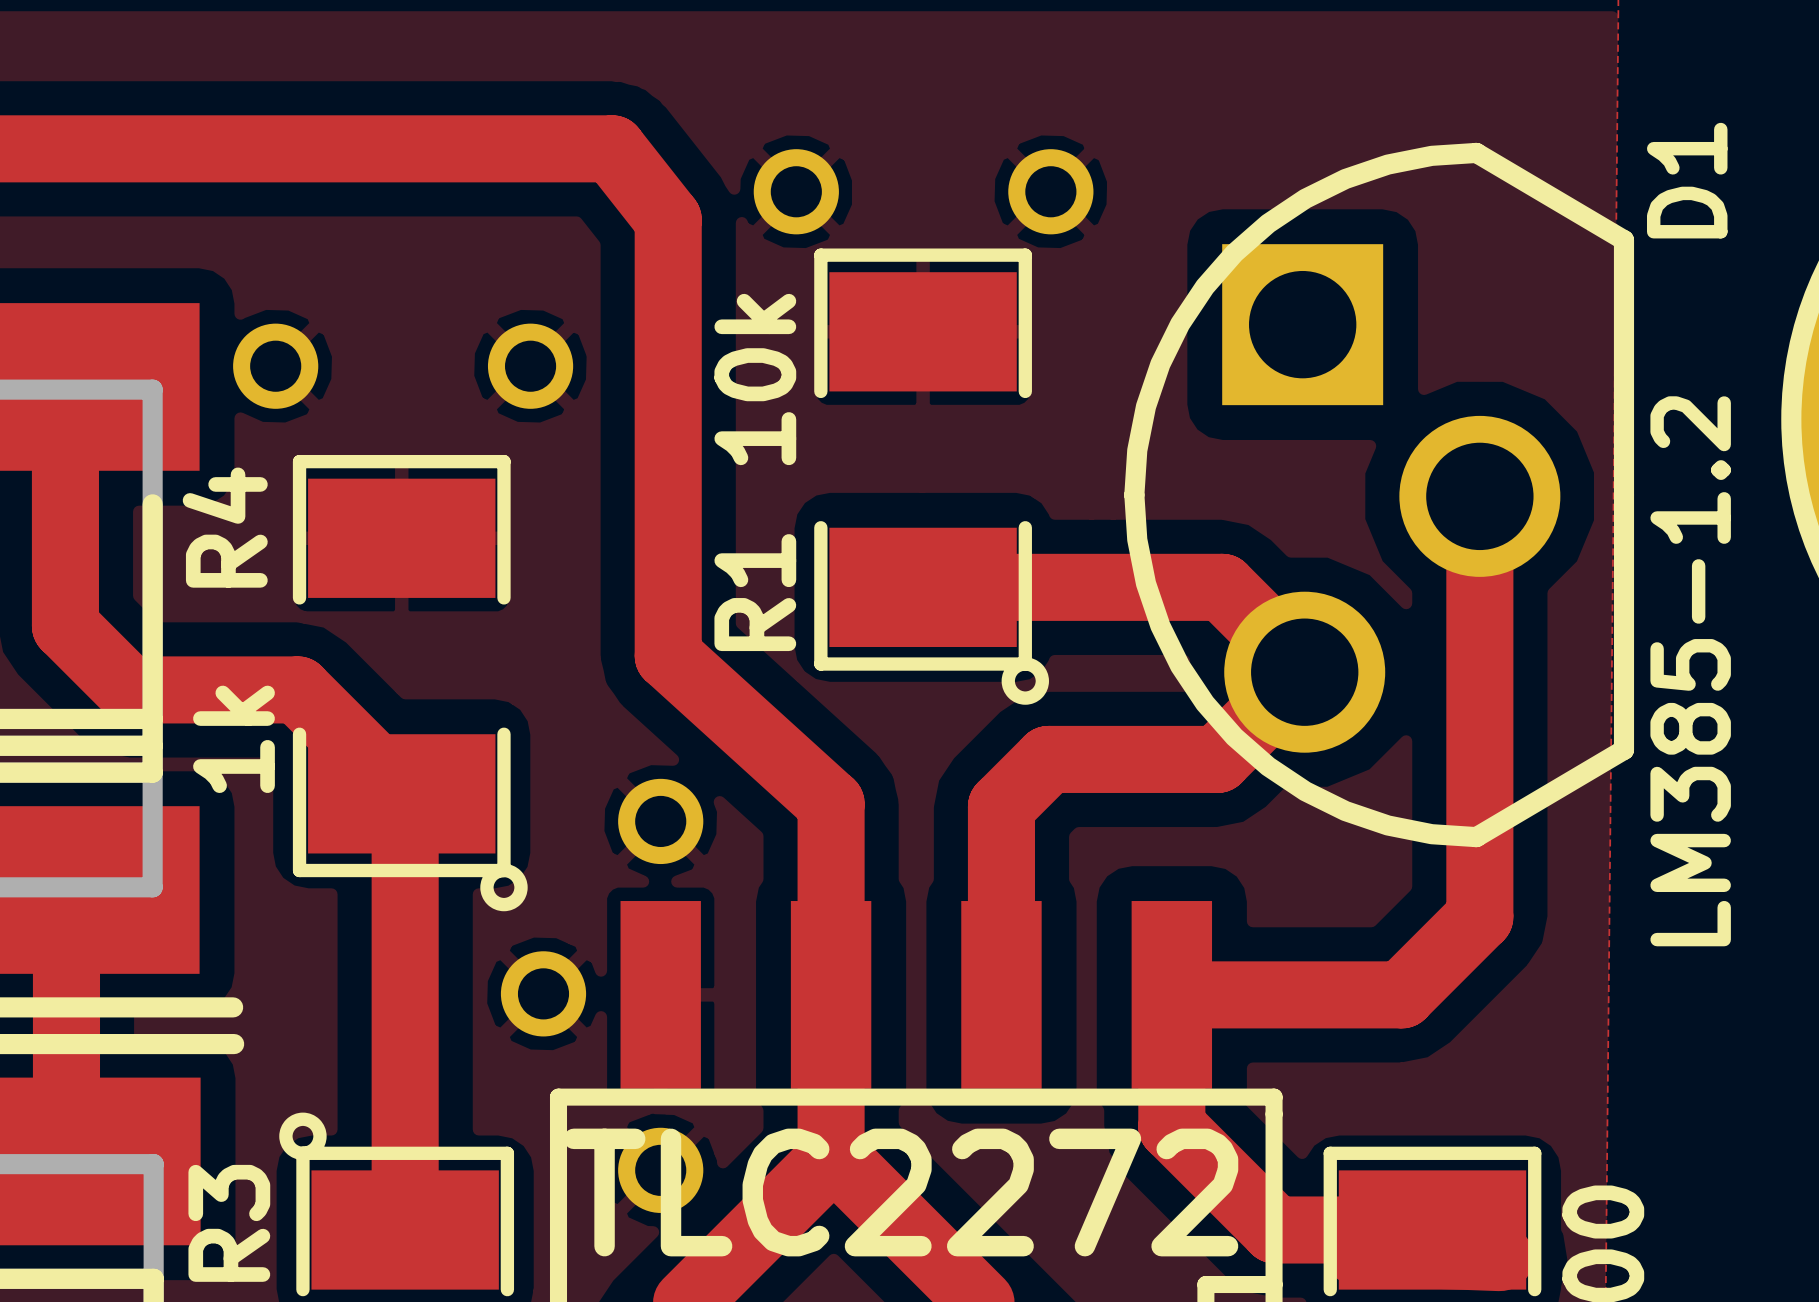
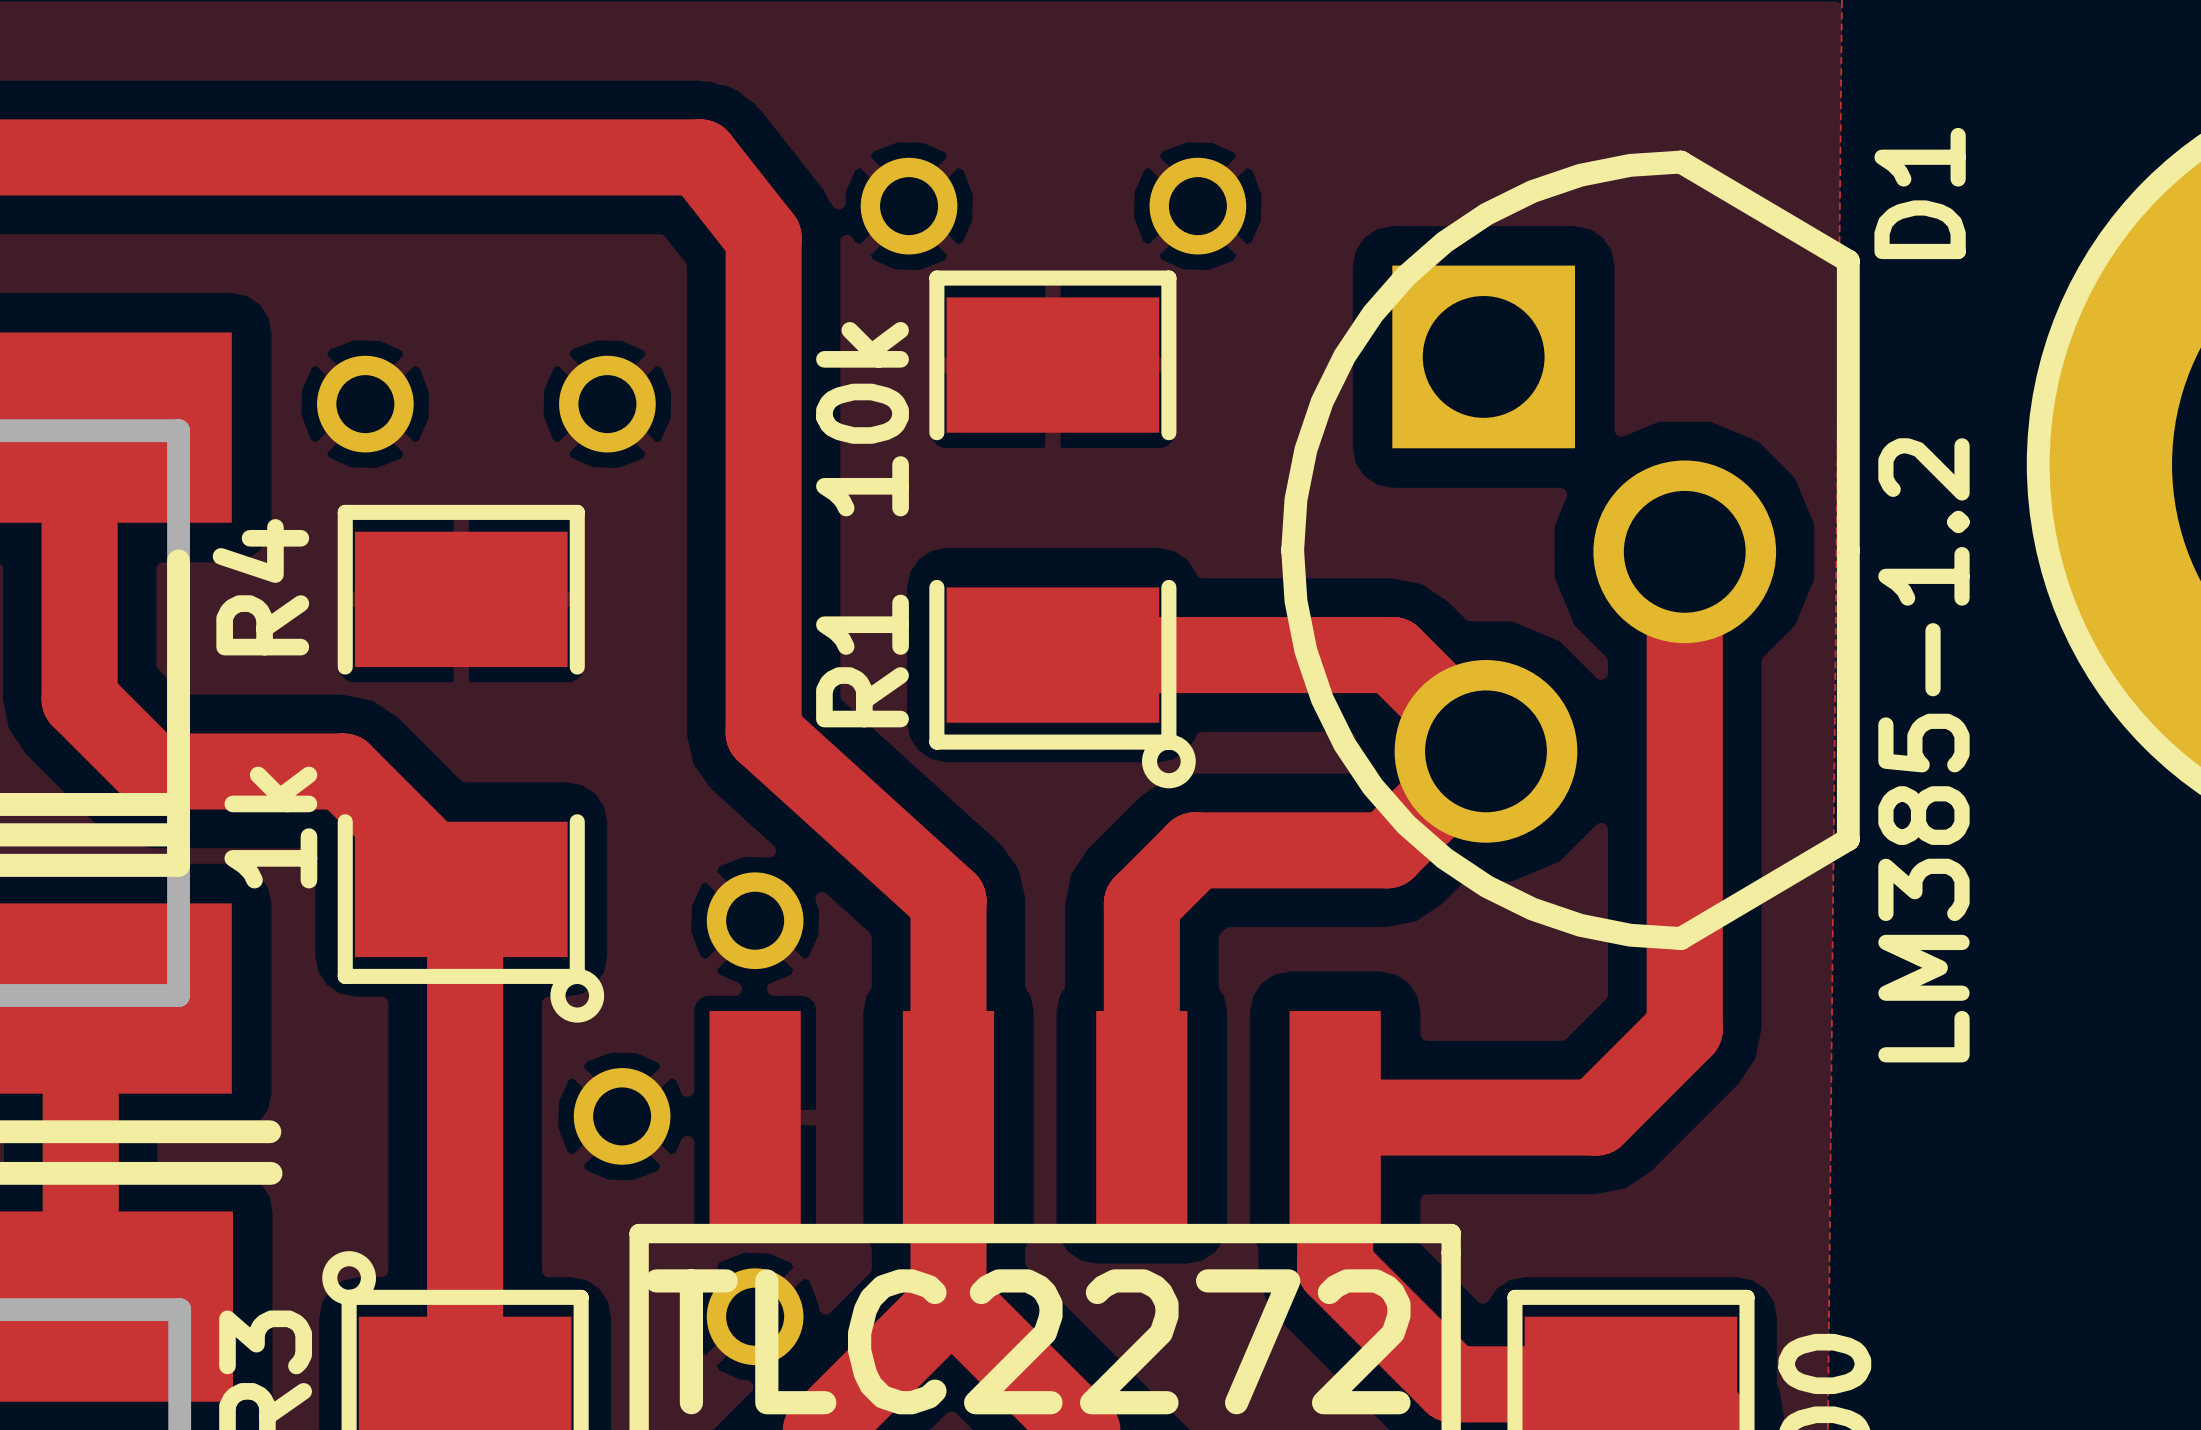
part position: (275, 366) -> (365, 404)

